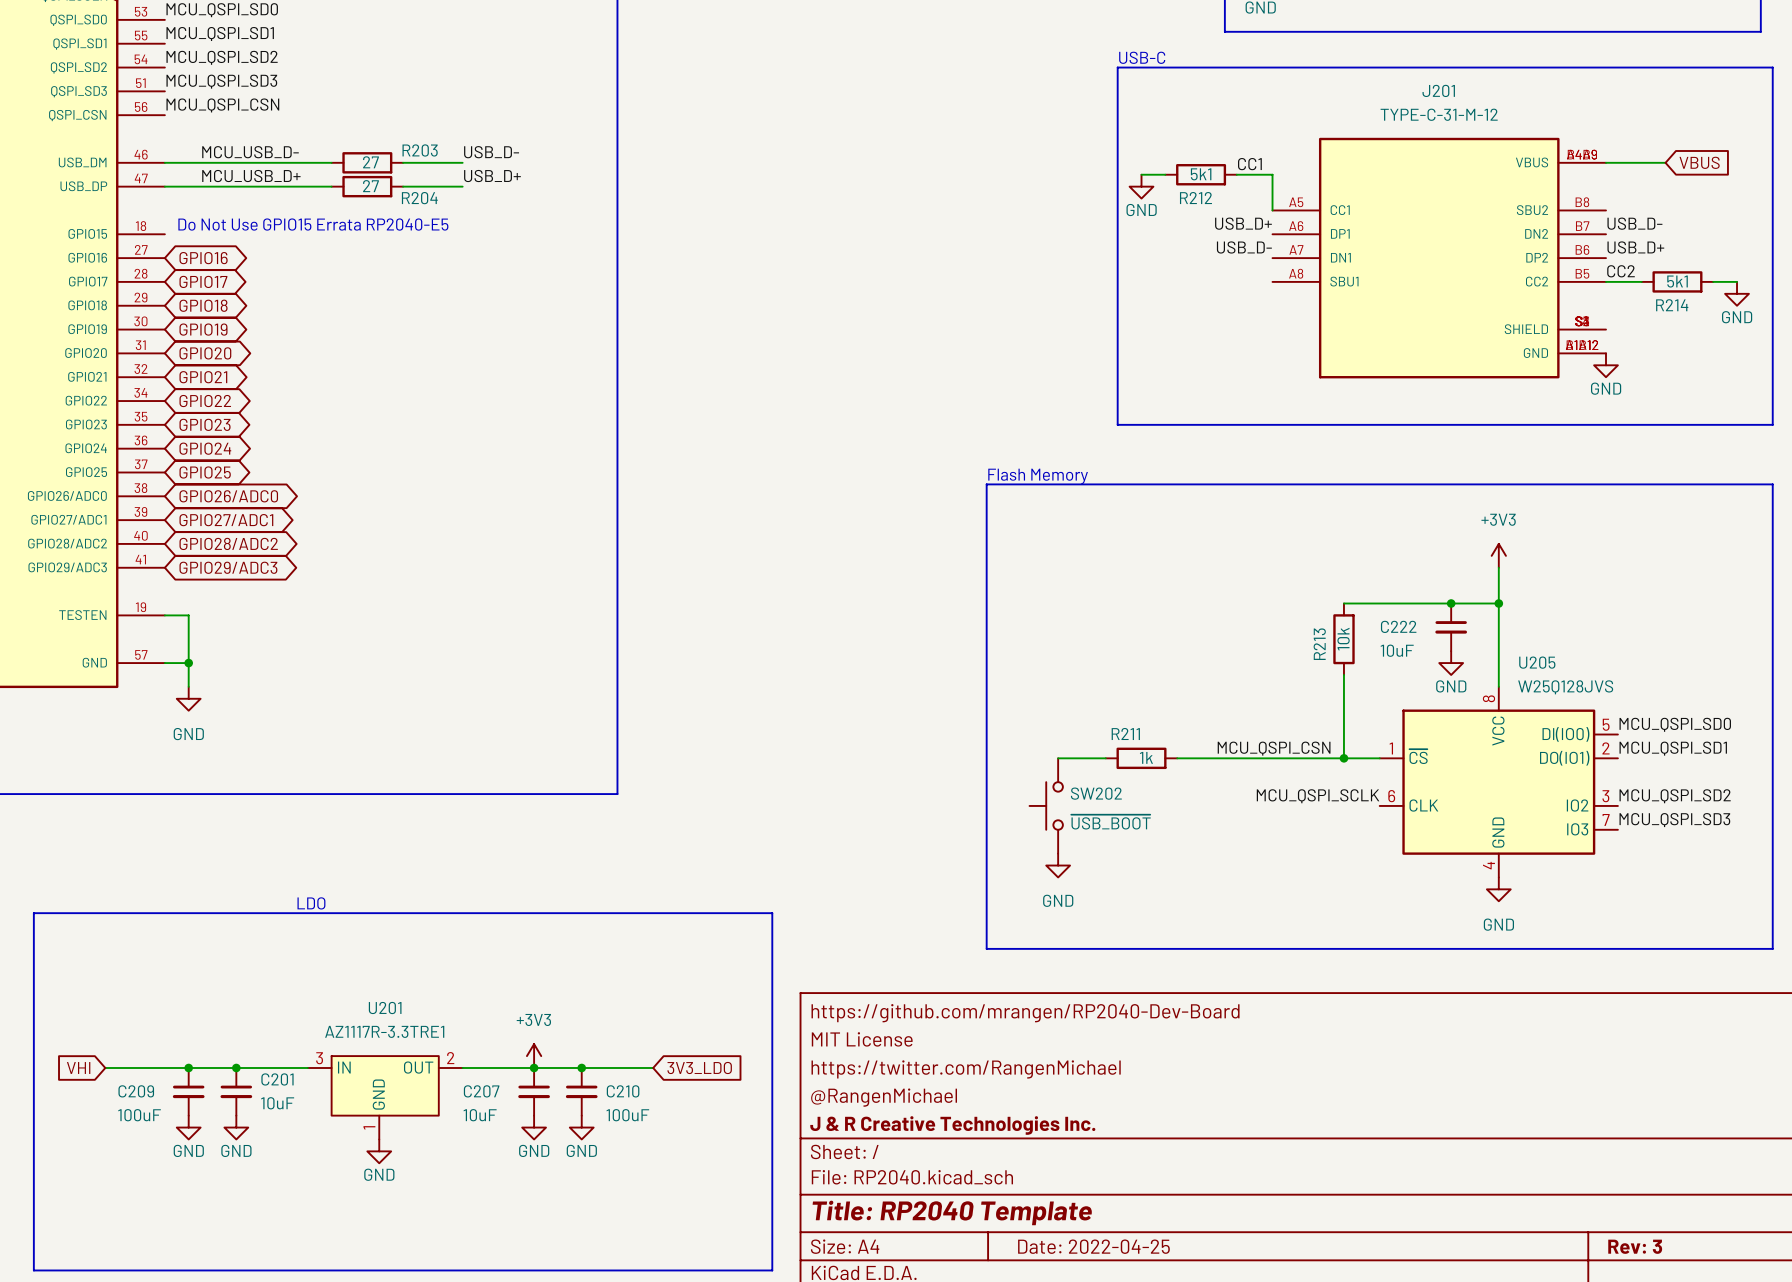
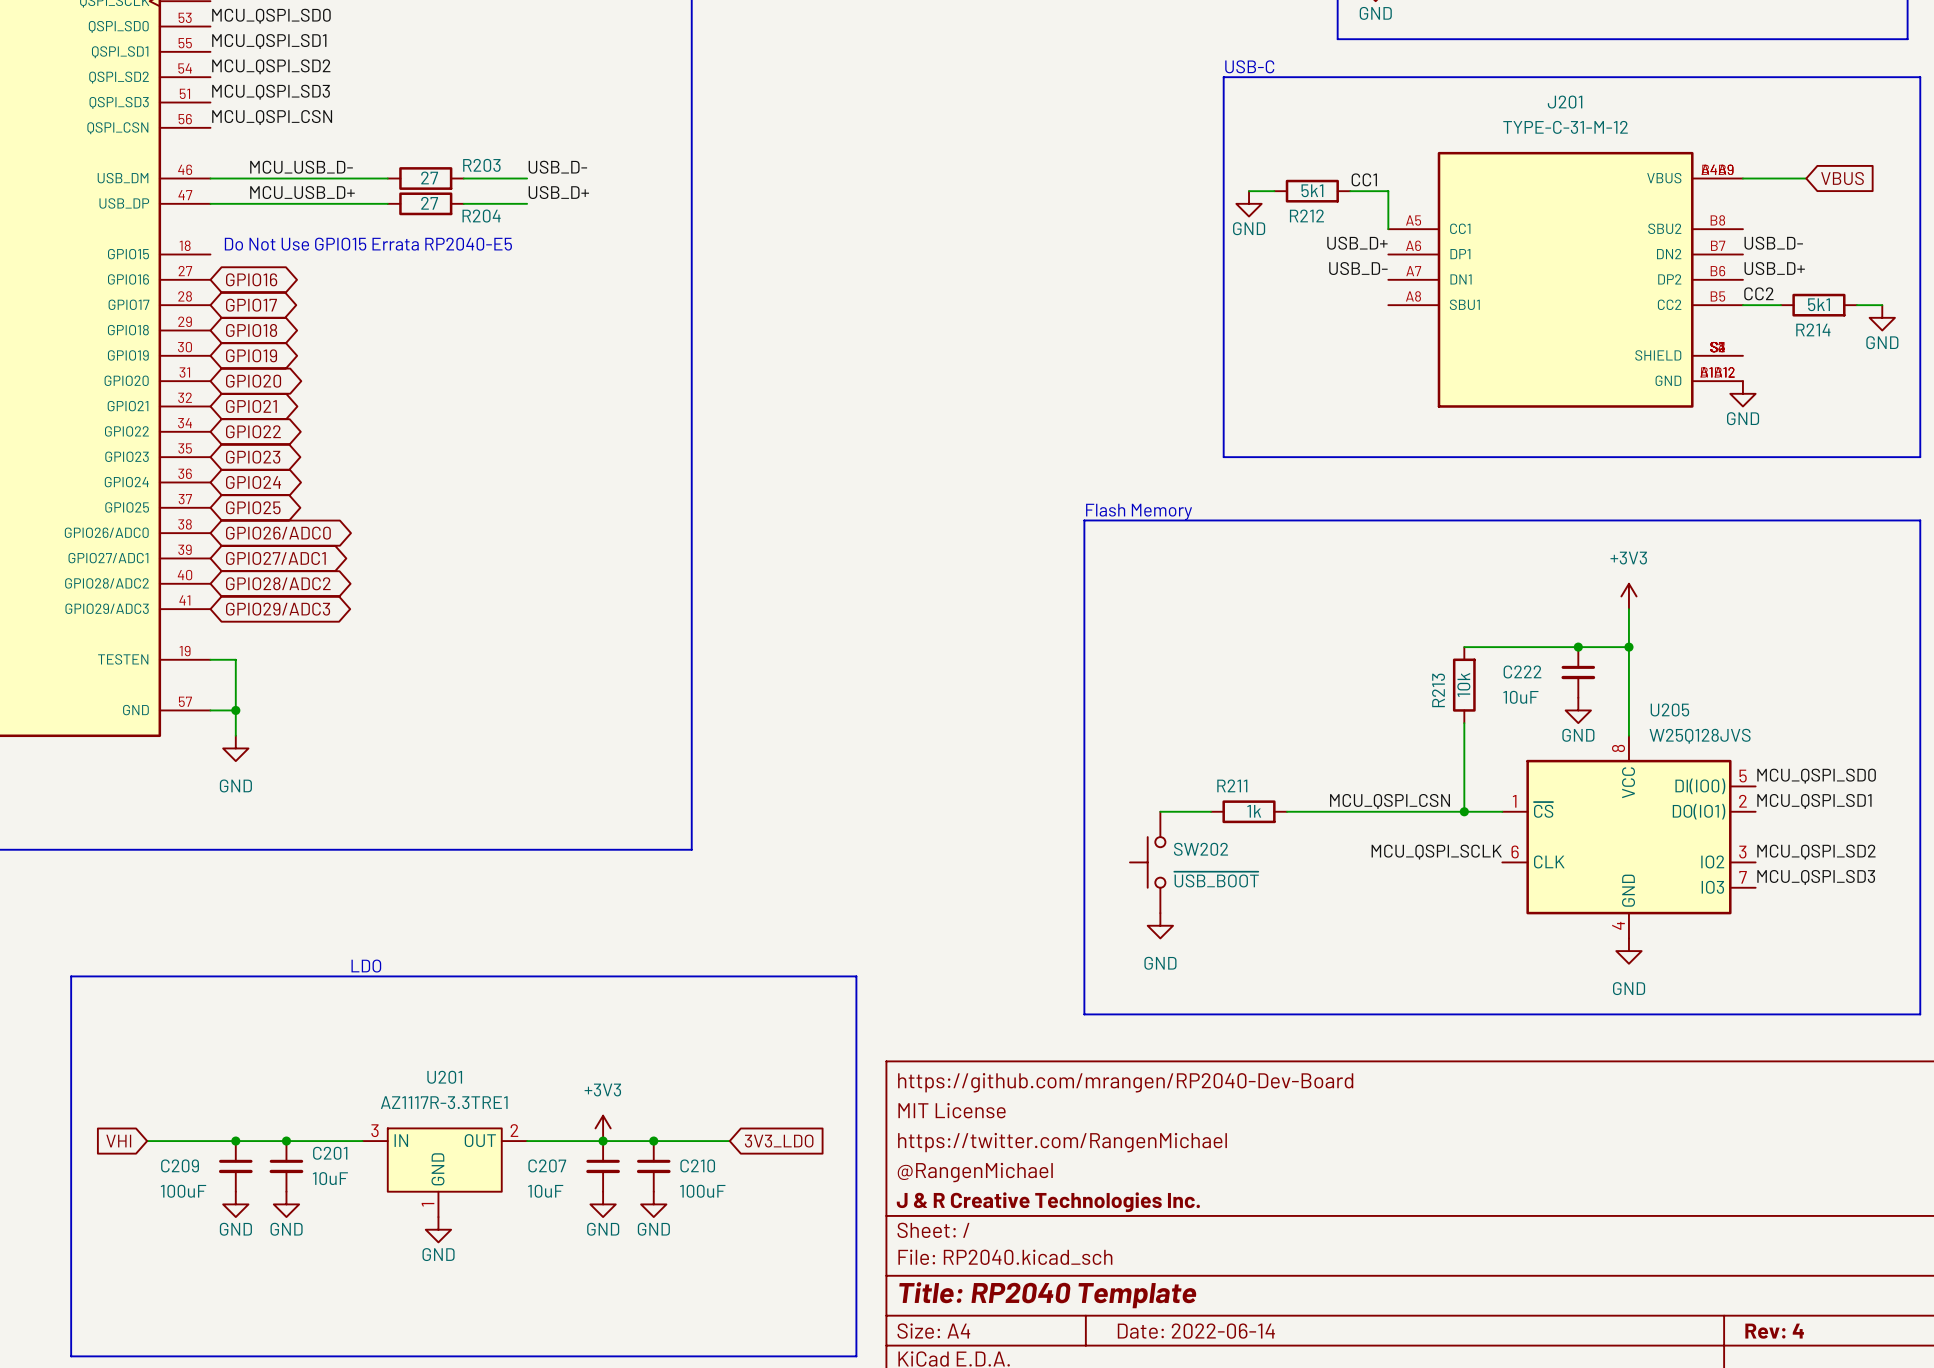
title block: Date: 2022-04-25 (1093, 1246) -> Date: 2022-06-14 (1196, 1331)
title block: Rev: 3 (1635, 1246) -> Rev: 4 (1774, 1331)

